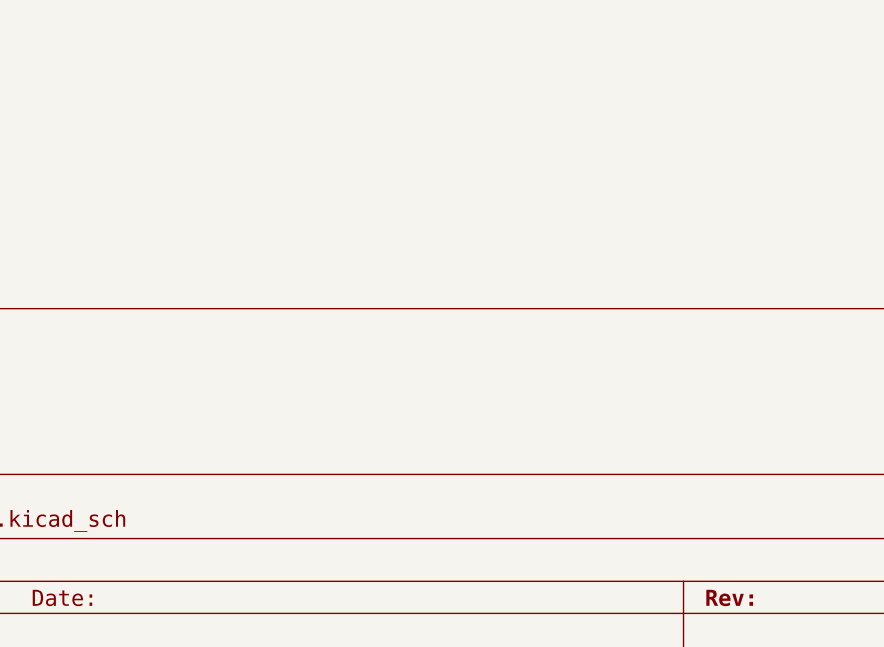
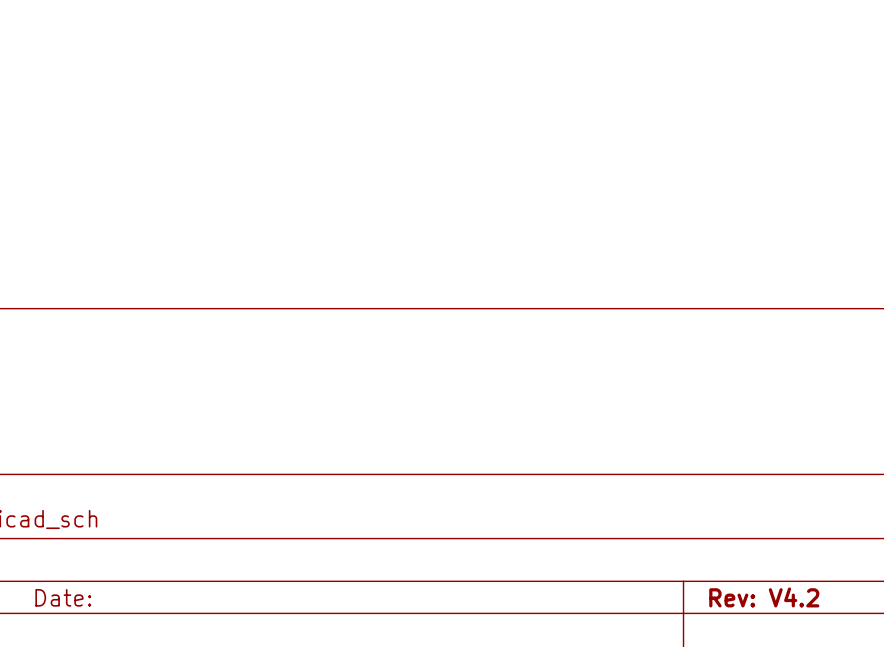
title block: Rev: (729, 597) -> Rev: V4.2 (764, 597)

